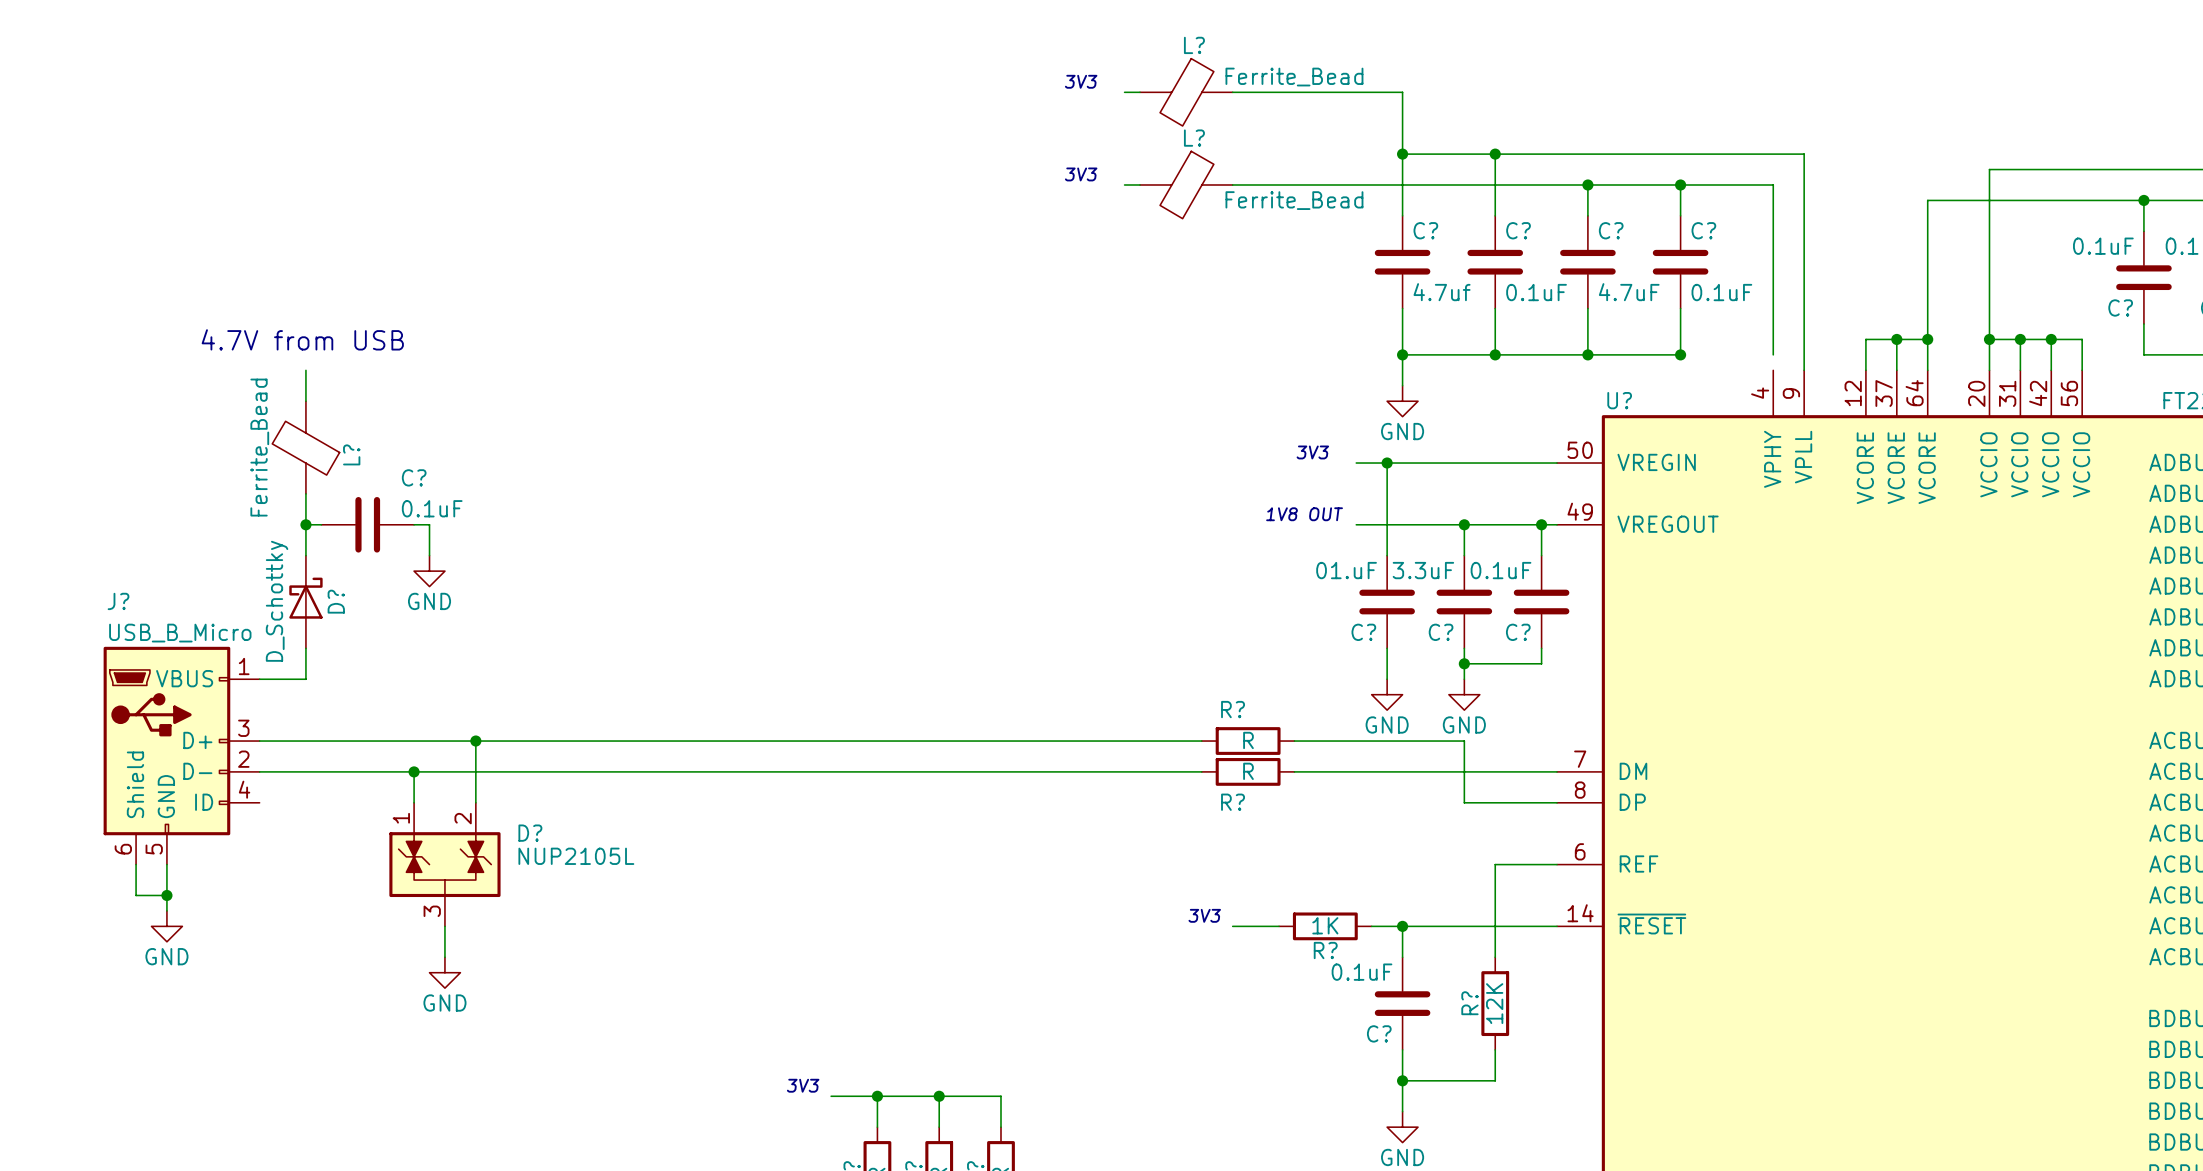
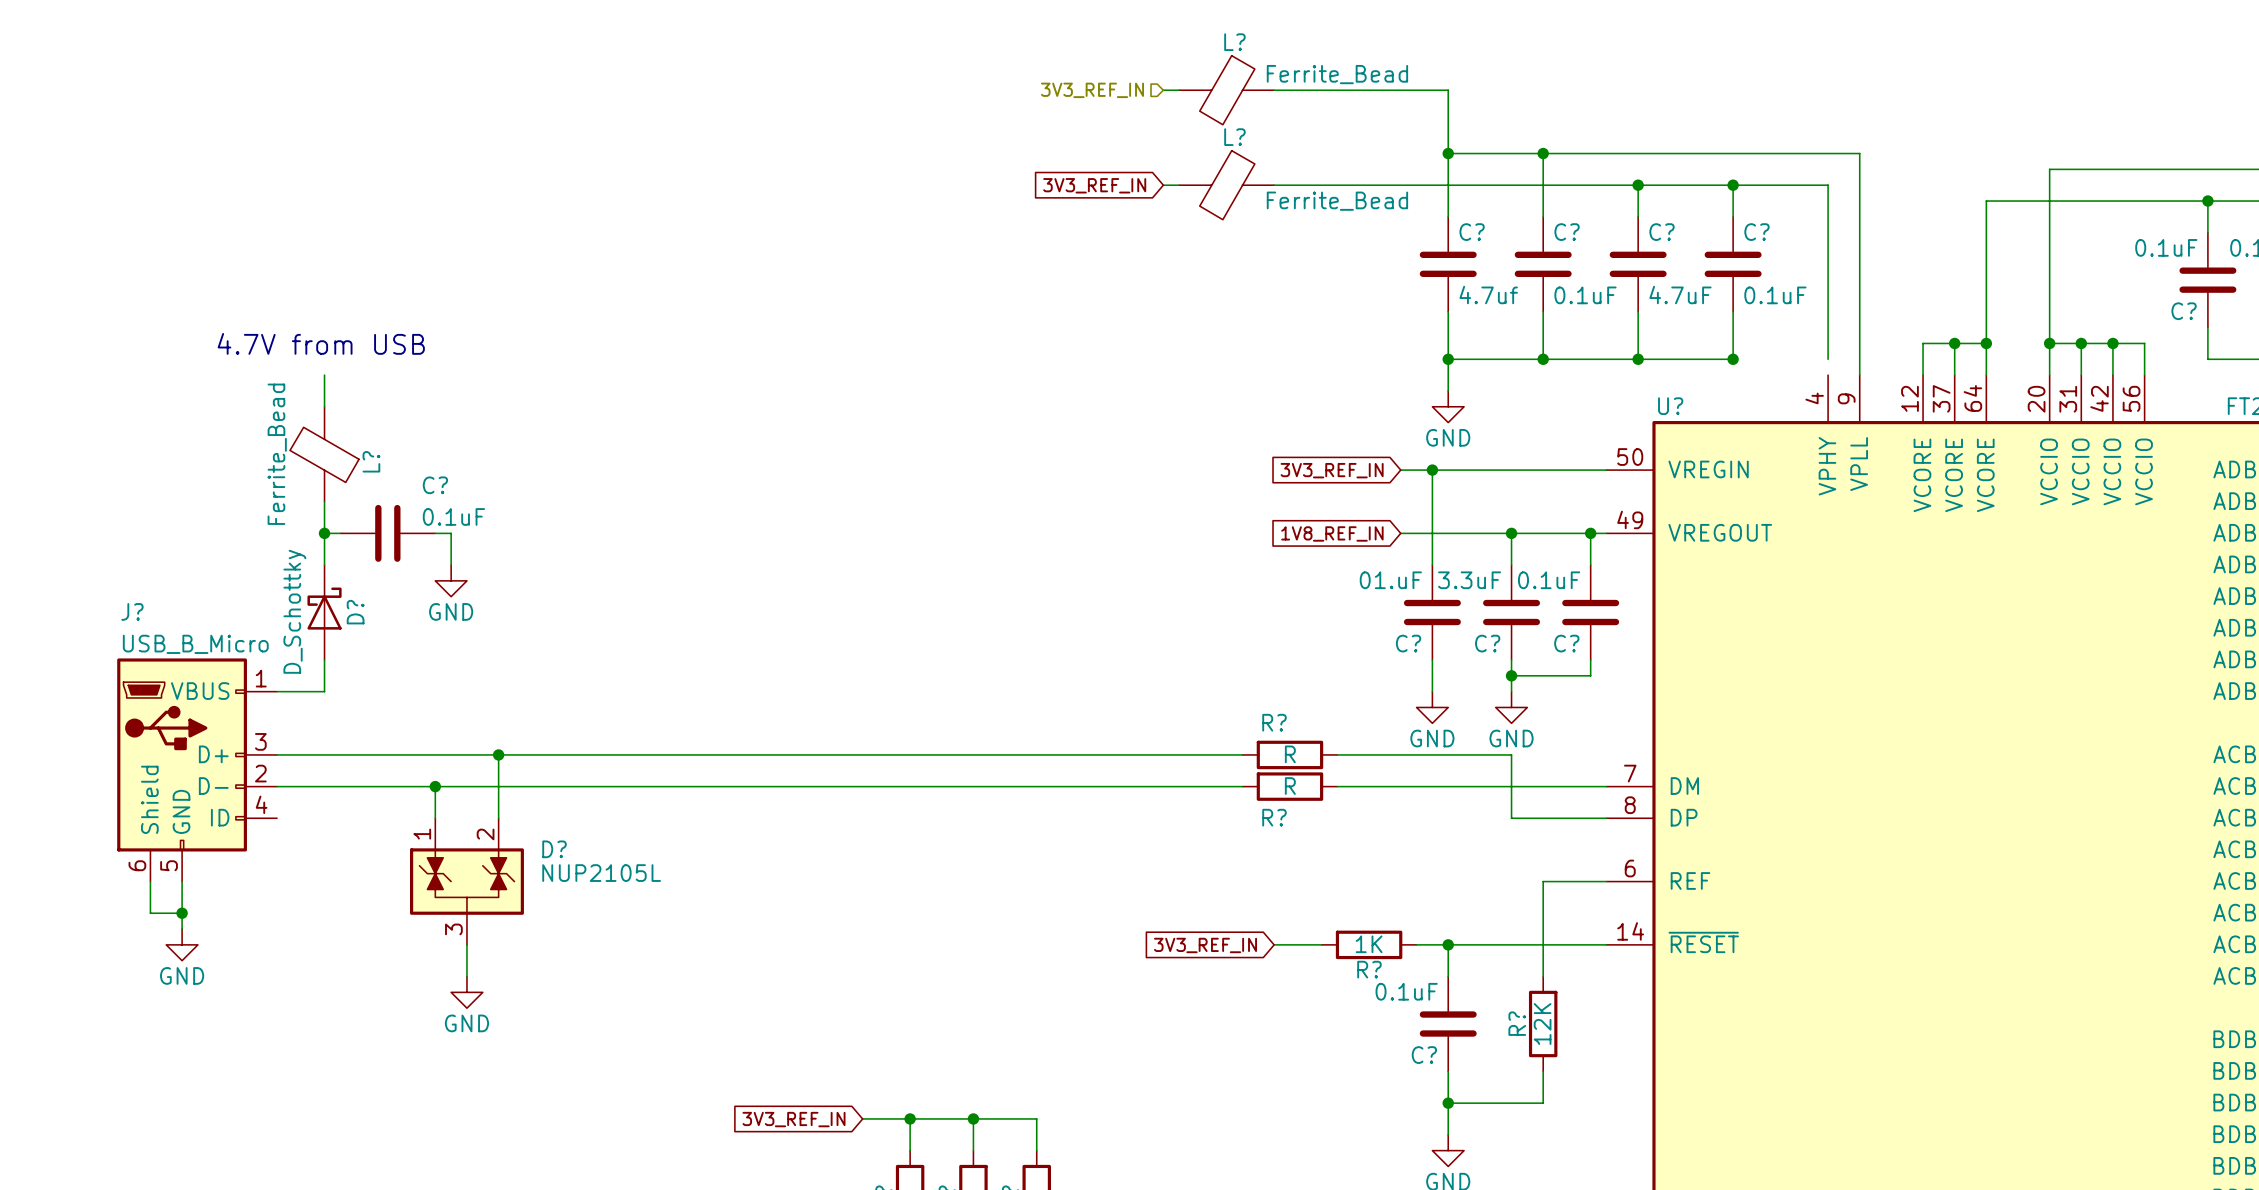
text: 3V3 (1081, 81) -> none
hierarchical label: none -> 3V3_REF_IN (1092, 90)
text: 3V3 (1081, 174) -> none
global label: none -> 3V3_REF_IN (1094, 185)
text: 3V3 (1312, 452) -> none
global label: none -> 3V3_REF_IN (1332, 470)
text: 1V8 OUT (1304, 514) -> none
global label: none -> 1V8_REF_IN (1332, 533)
text: 3V3 (1204, 915) -> none
global label: none -> 3V3_REF_IN (1205, 945)
text: 3V3 (803, 1085) -> none
global label: none -> 3V3_REF_IN (794, 1119)

